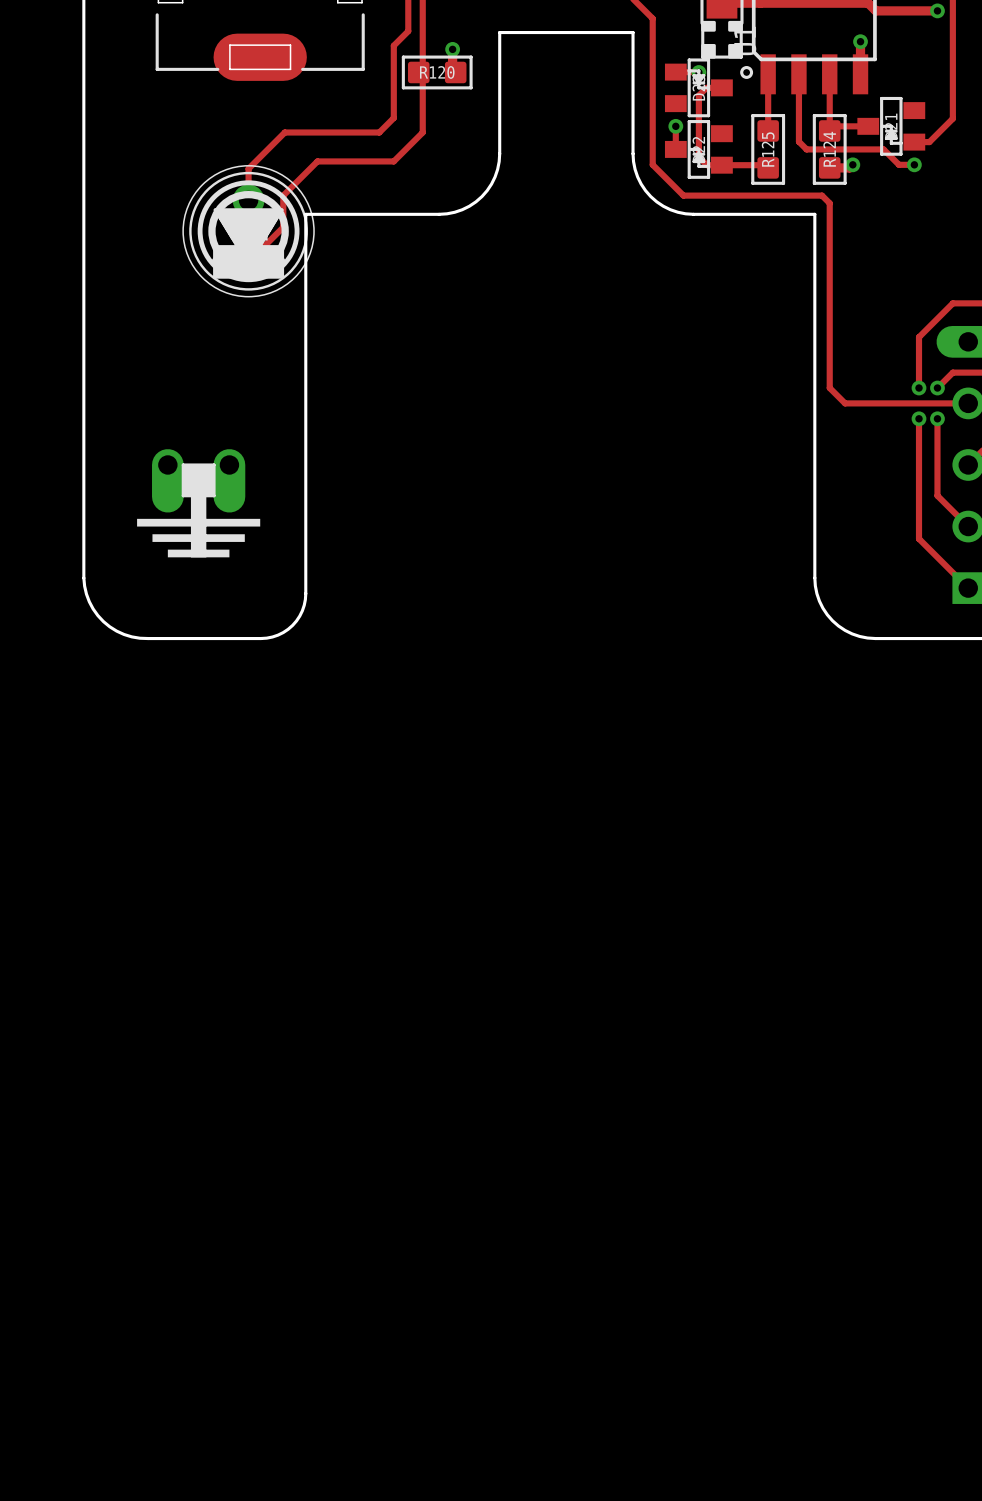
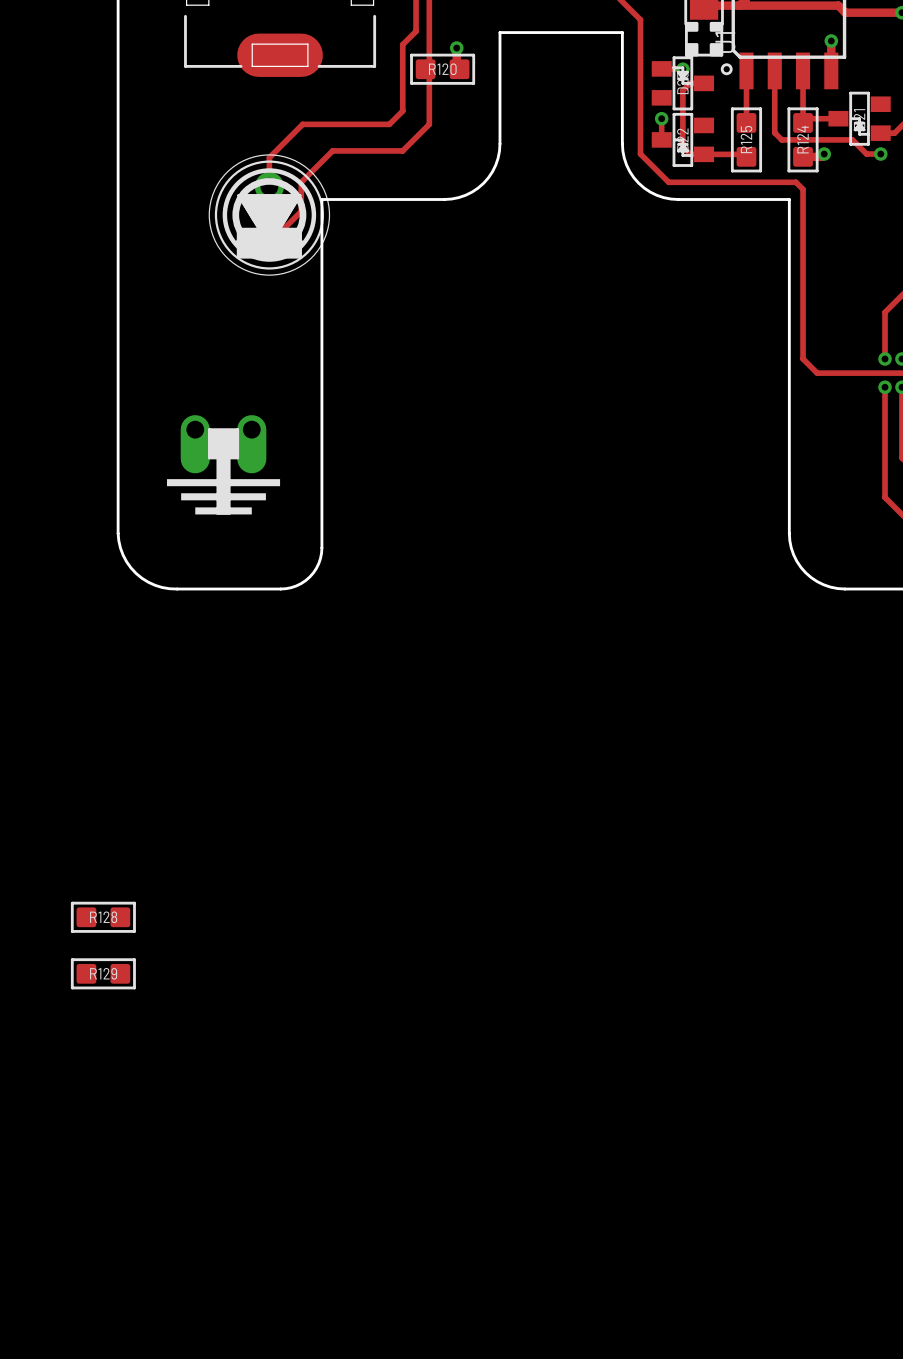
R128: none -> (103, 917)
R129: none -> (103, 973)

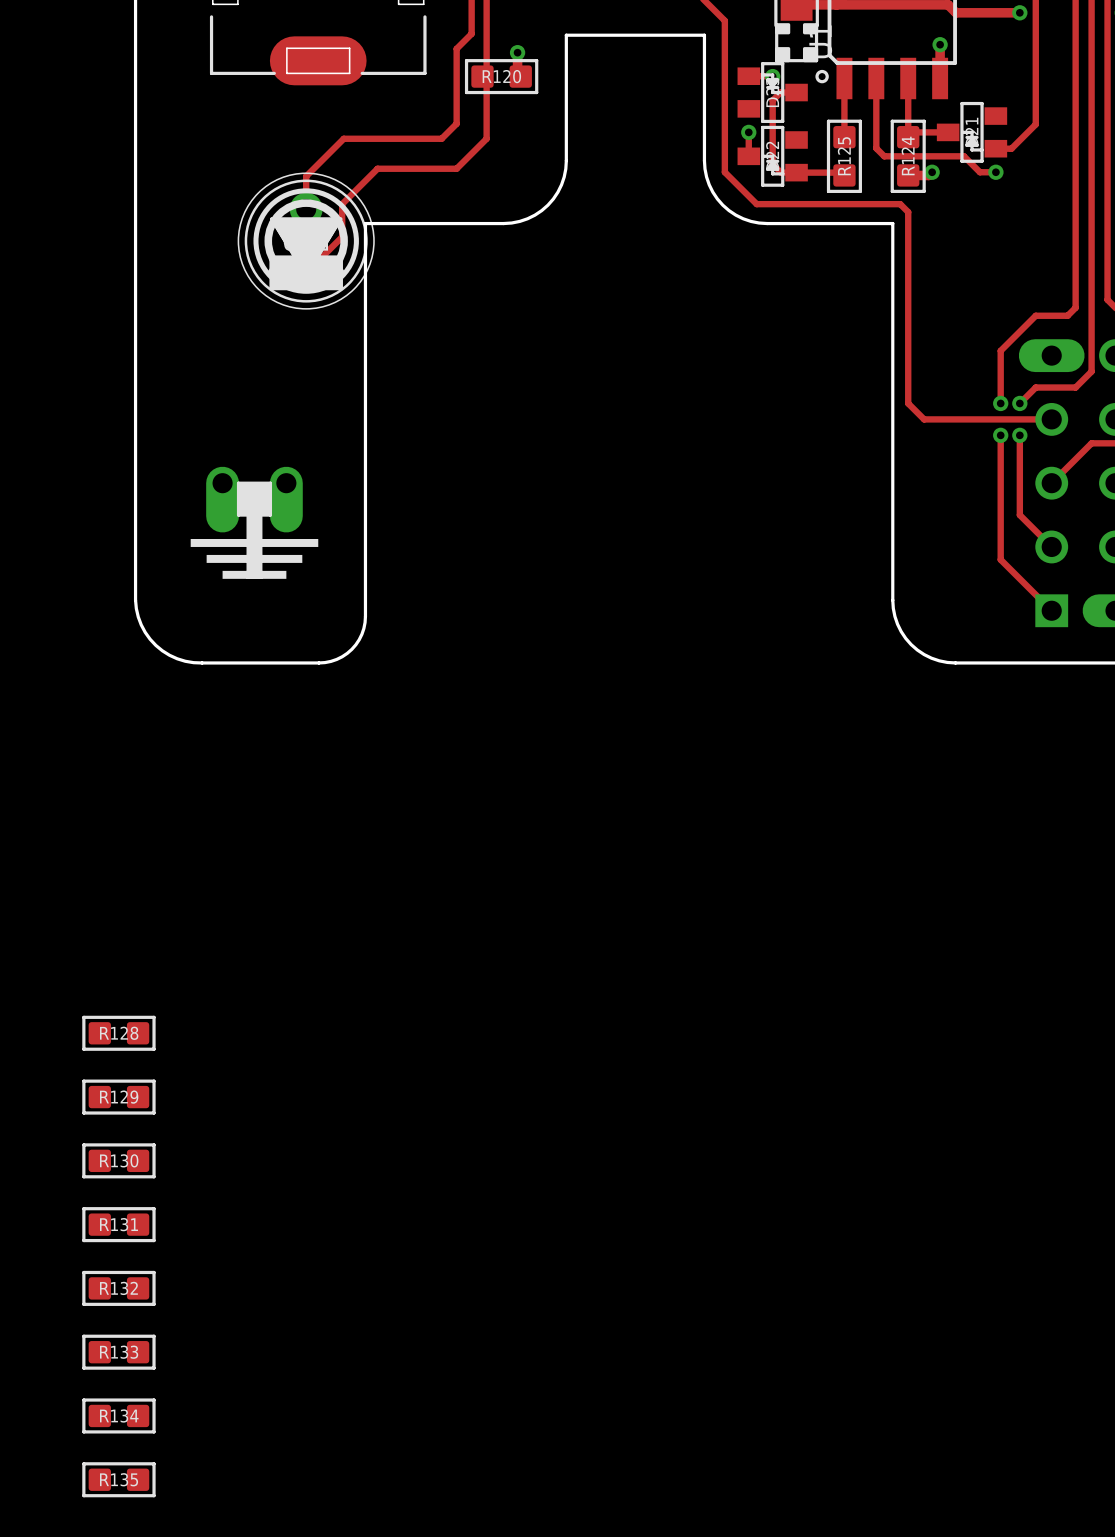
R130: none -> (118, 1160)
R131: none -> (118, 1224)
R132: none -> (118, 1288)
R133: none -> (118, 1352)
R134: none -> (118, 1415)
R135: none -> (118, 1479)

